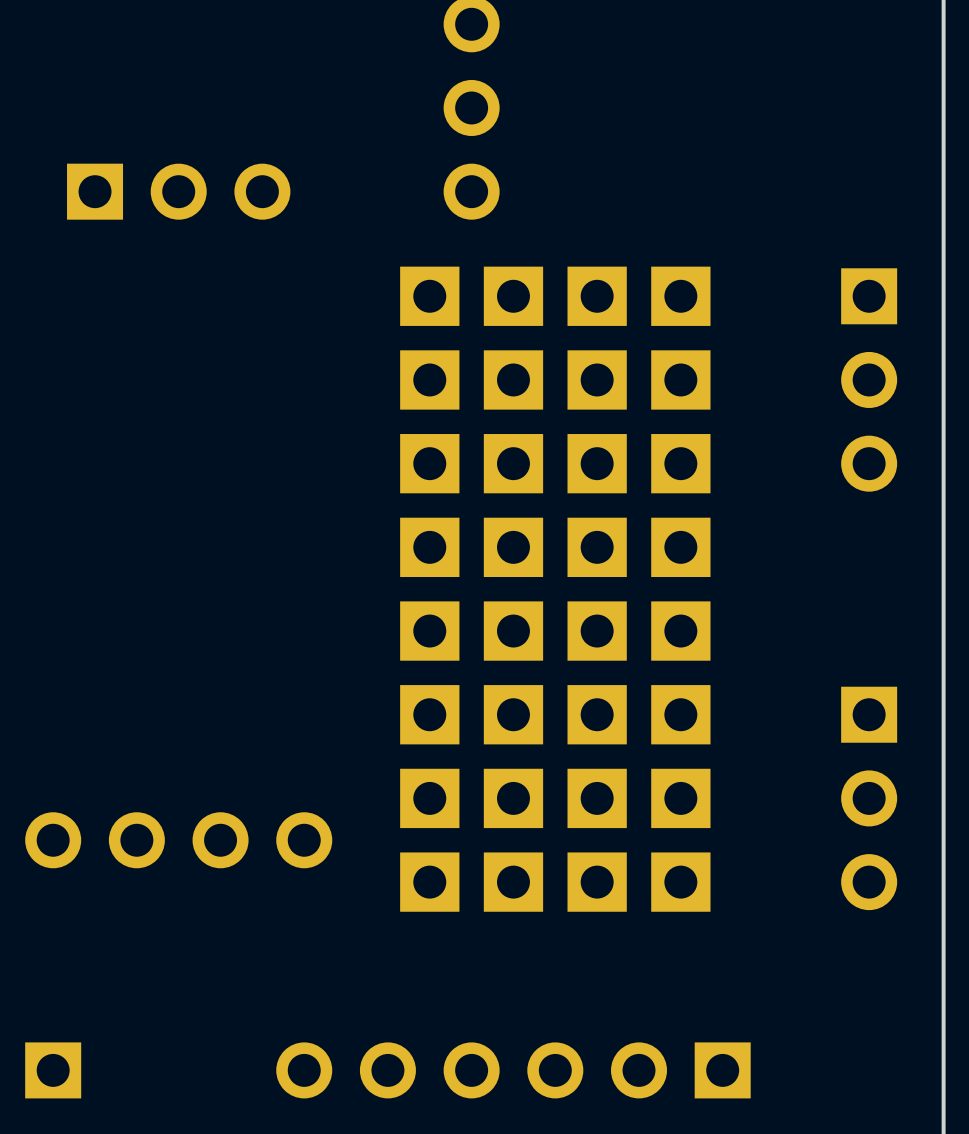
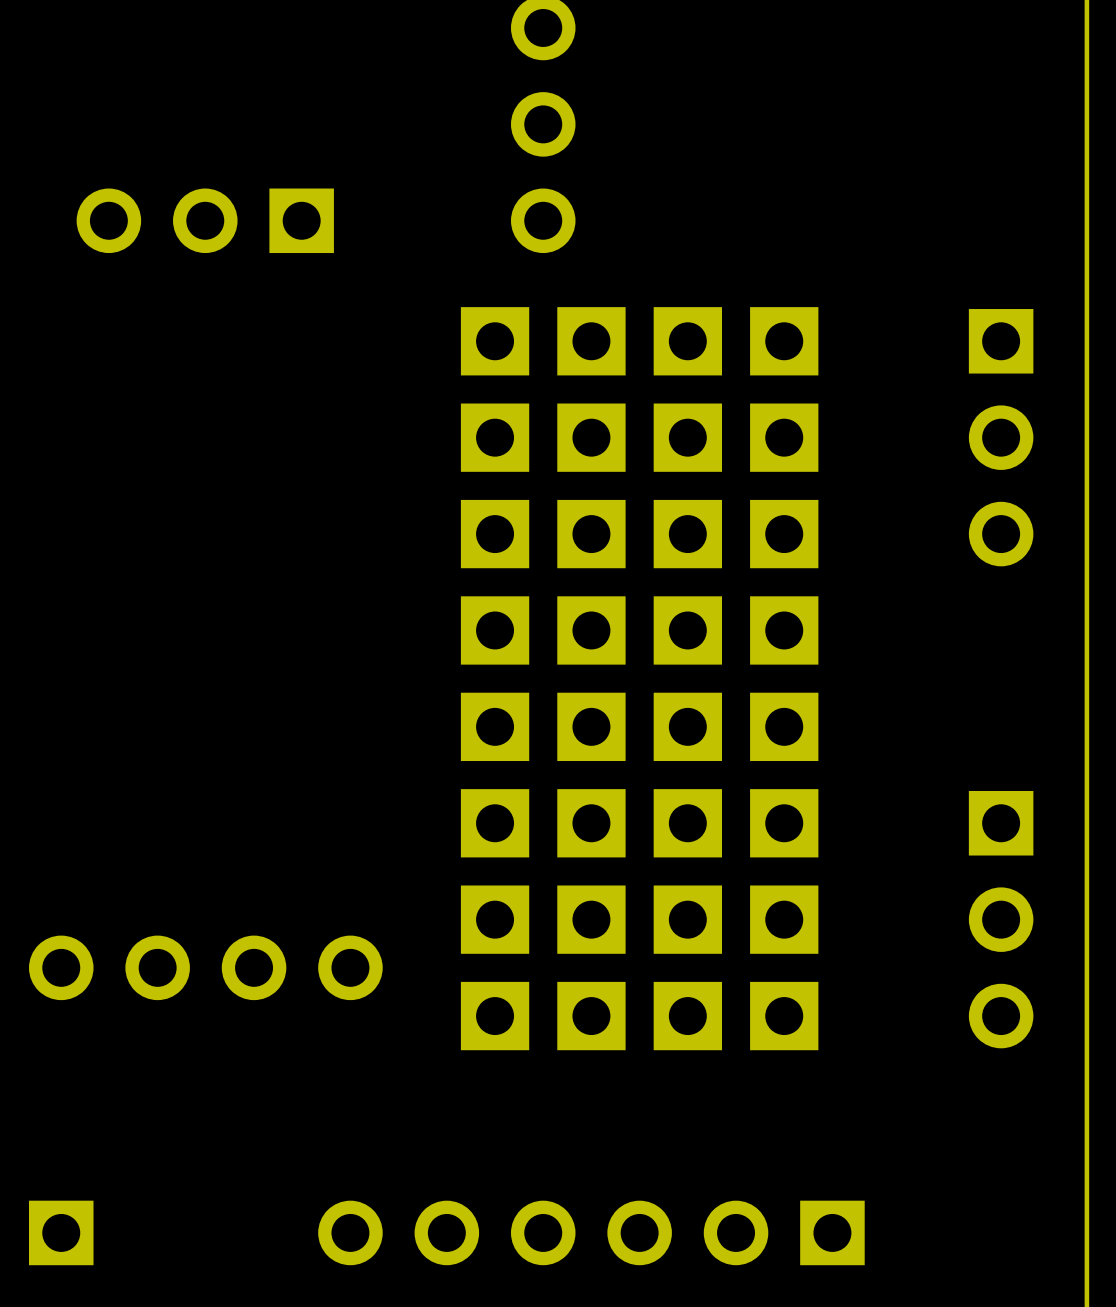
part rotation: 0° (178, 191) -> 180° (205, 220)

